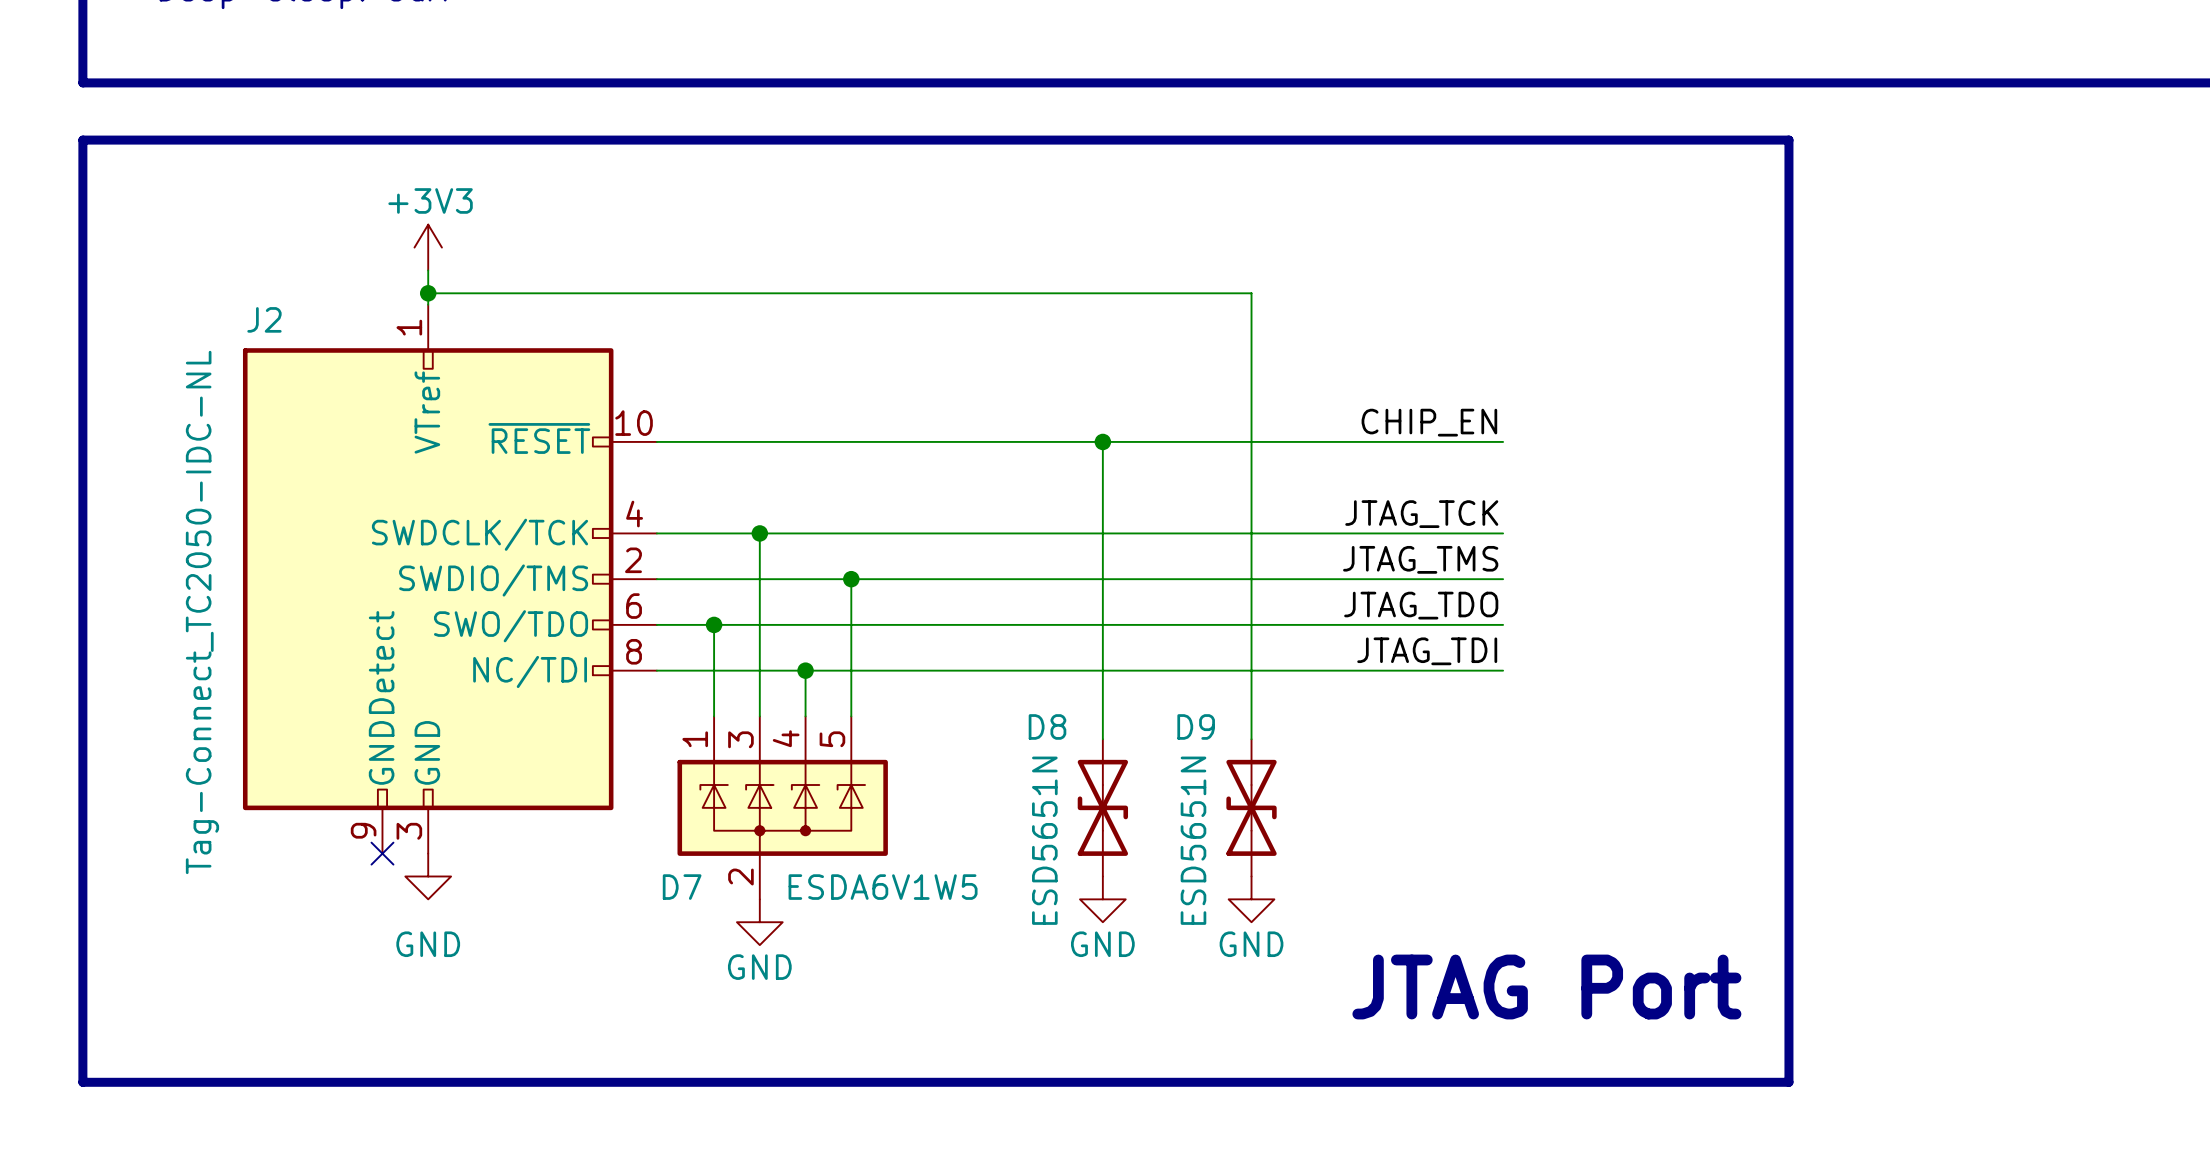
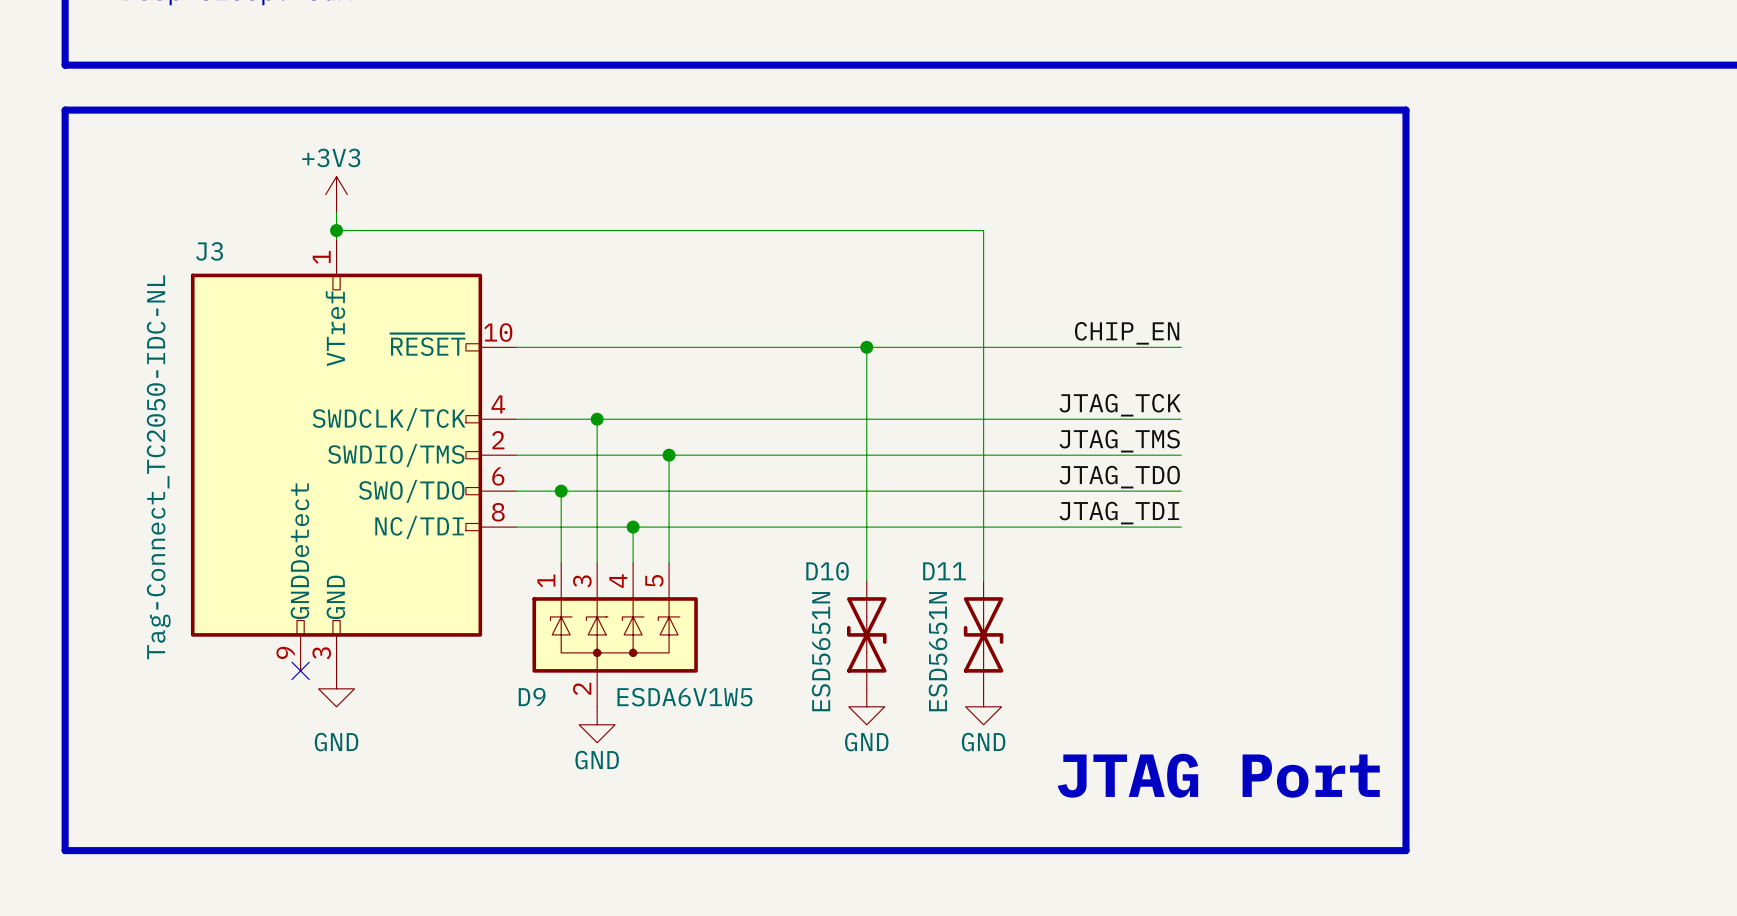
J2 name: J2 (264, 319) -> J3 (209, 251)
D8 name: D8 (1047, 726) -> D10 (827, 571)
D9 name: D9 (1196, 726) -> D11 (944, 571)
D7 name: D7 (682, 887) -> D9 (532, 697)

